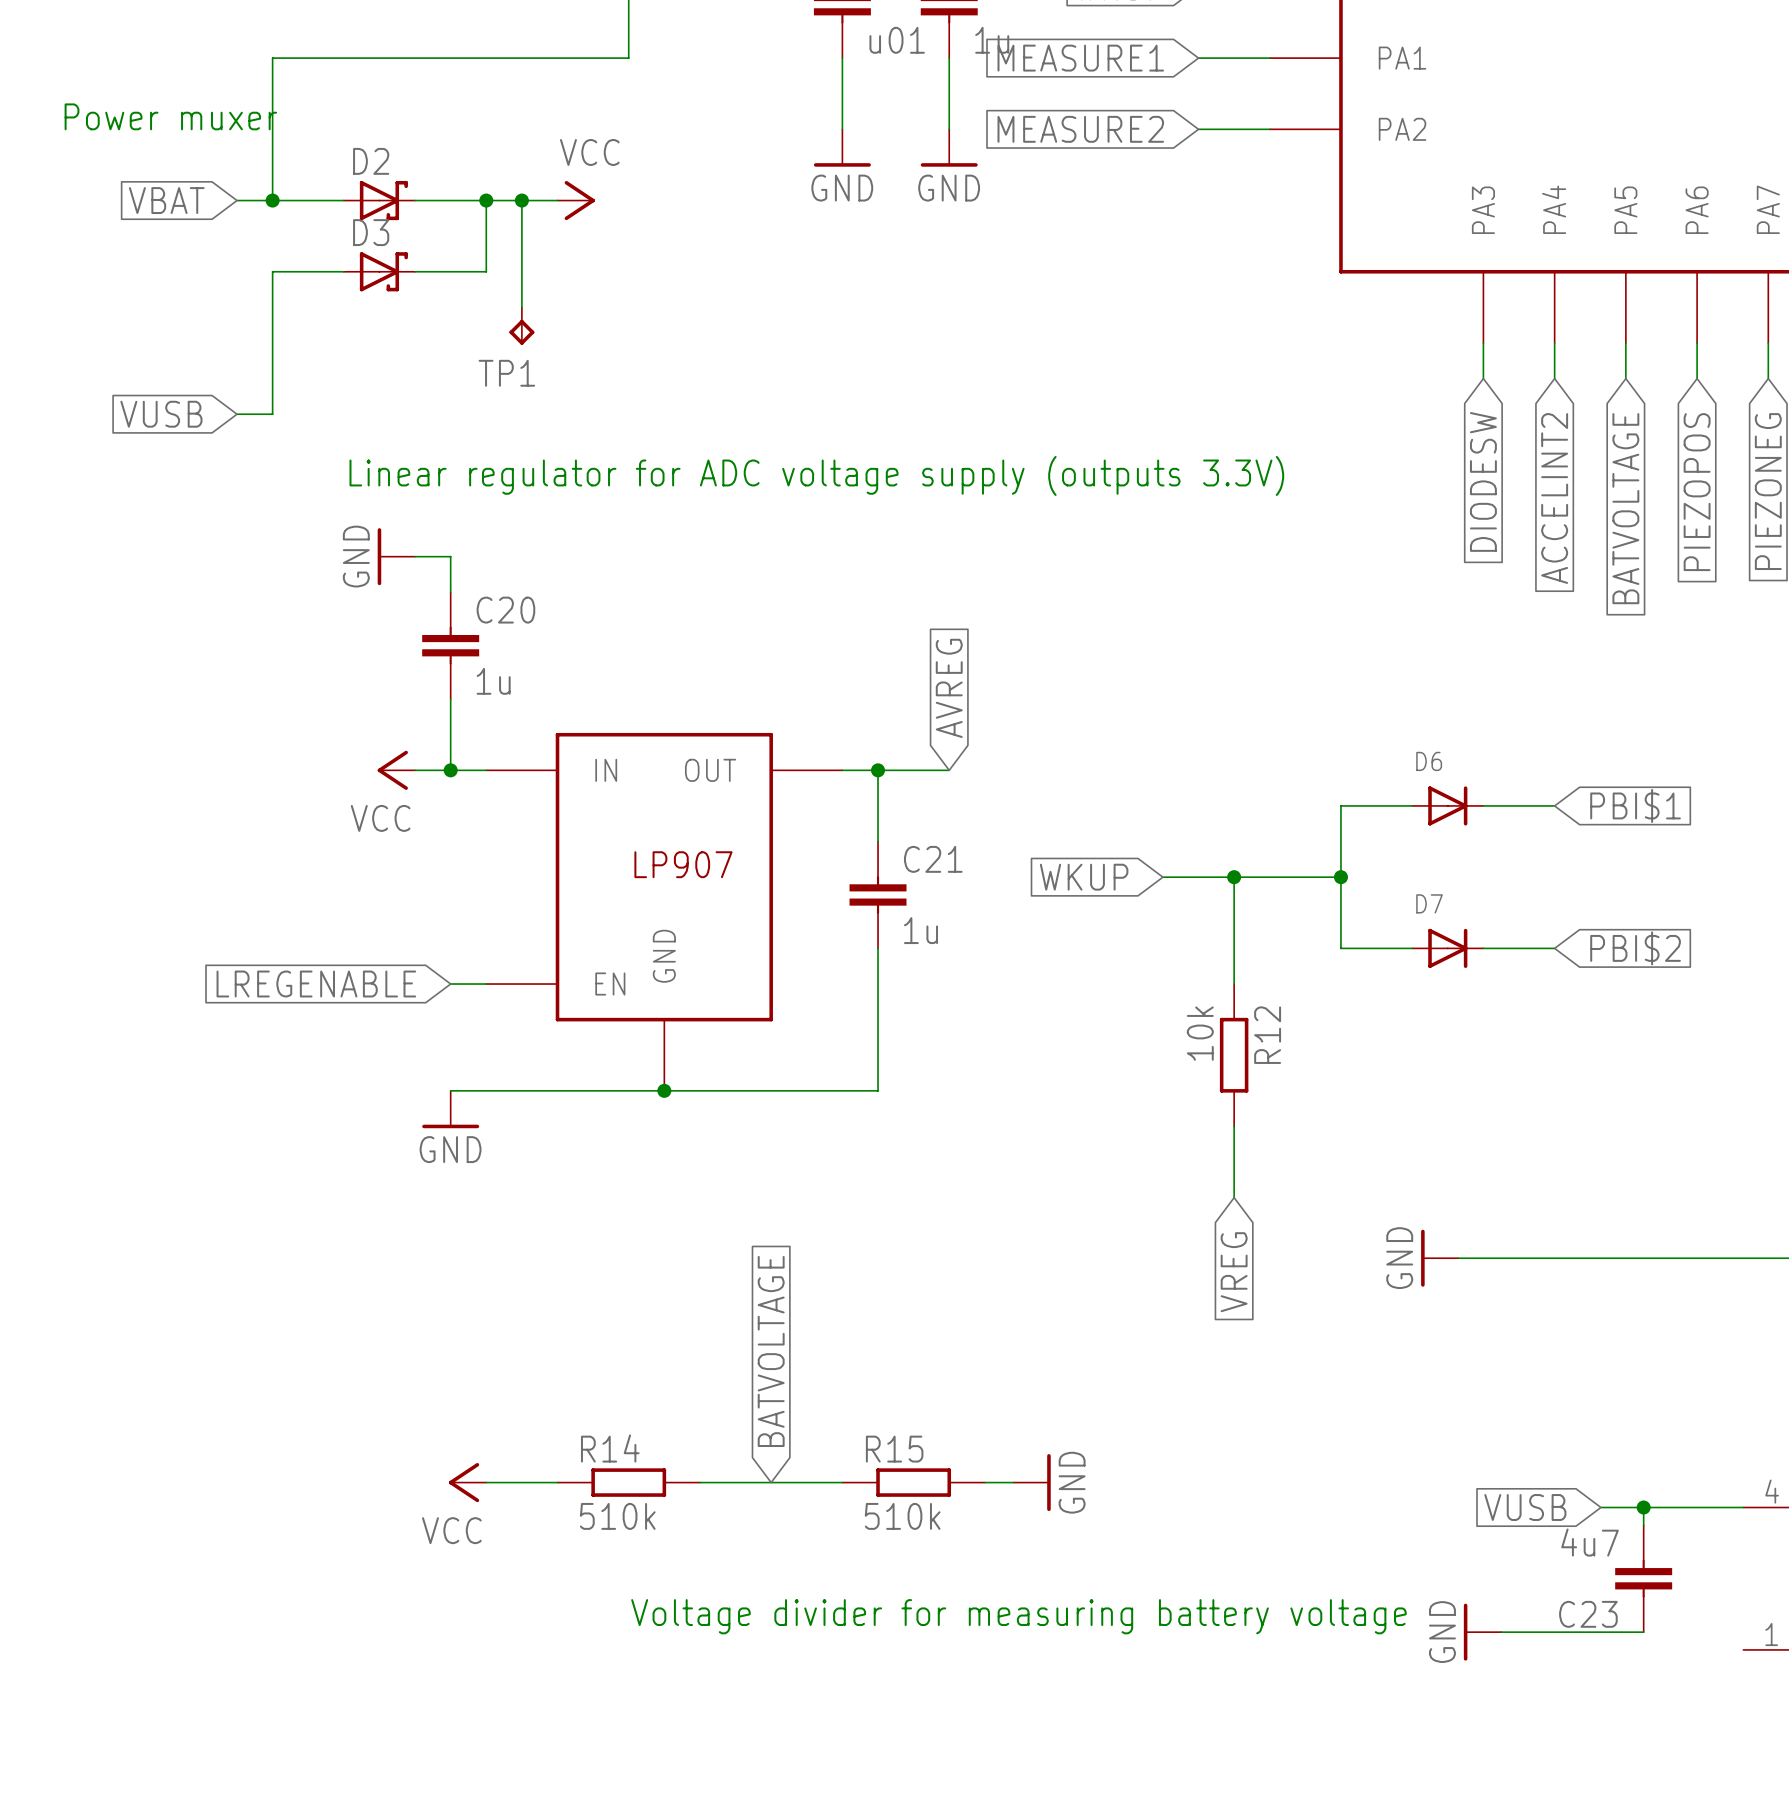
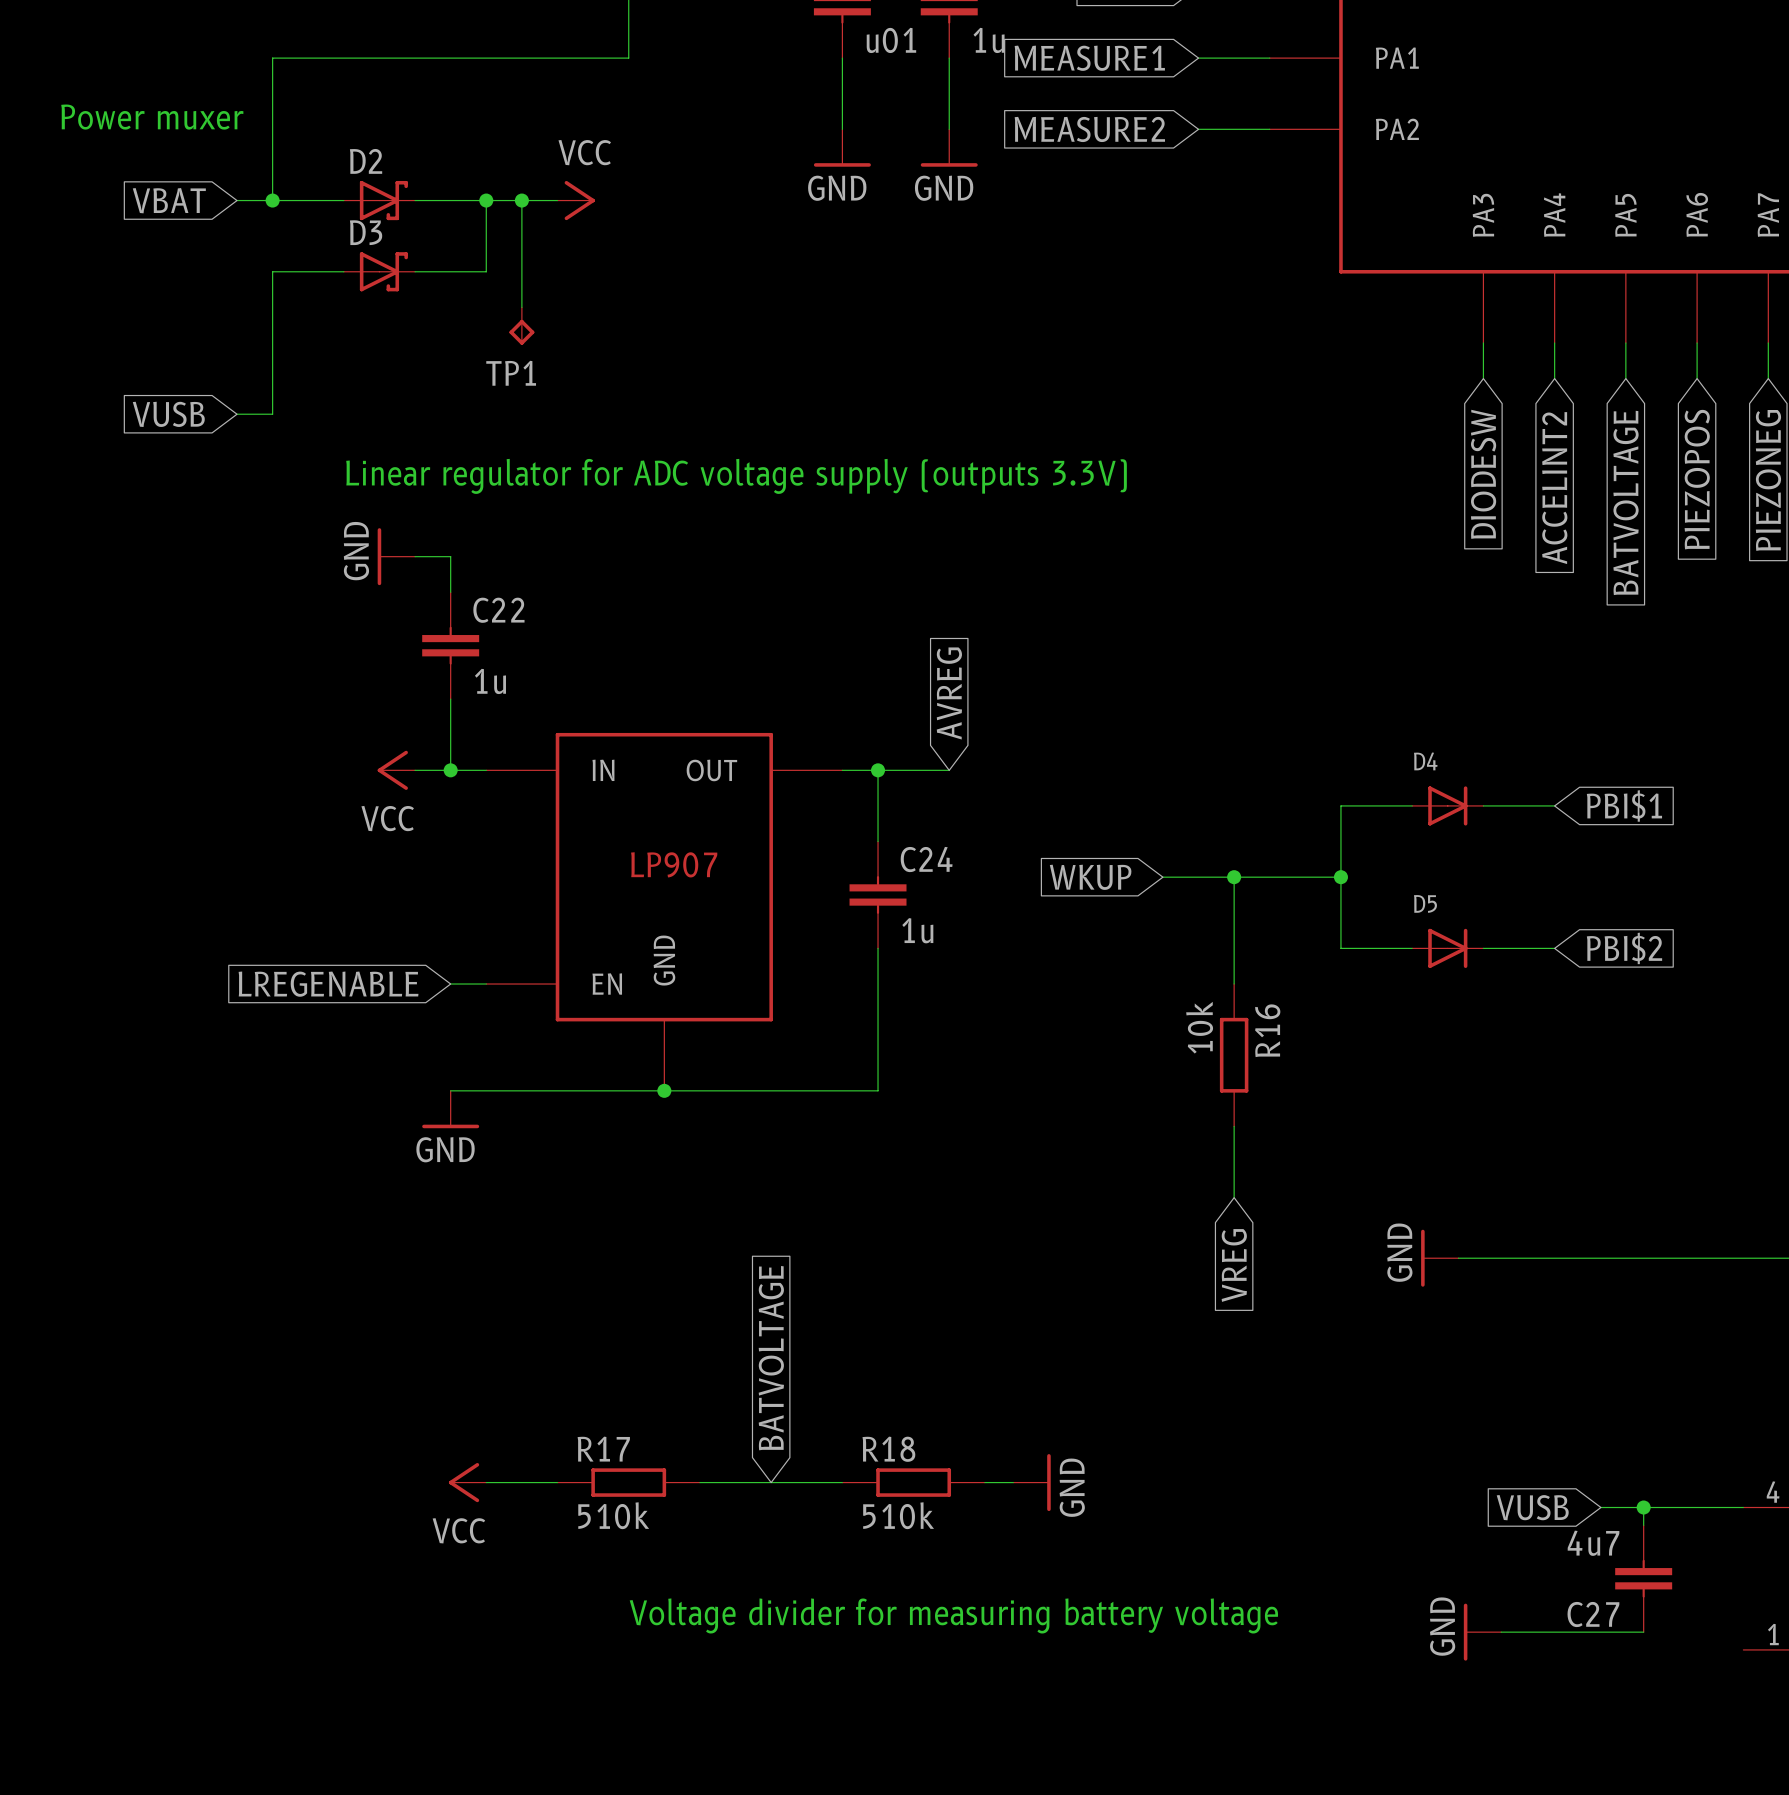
C20 name: C20 (505, 610) -> C22 (498, 610)
D6 name: D6 (1429, 761) -> D4 (1425, 761)
C21 name: C21 (933, 859) -> C24 (926, 859)
D7 name: D7 (1429, 903) -> D5 (1425, 903)
R12 name: R12 (1267, 1035) -> R16 (1267, 1030)
R14 name: R14 (610, 1448) -> R17 (603, 1449)
R15 name: R15 (894, 1449) -> R18 (888, 1449)
C23 name: C23 (1588, 1614) -> C27 (1593, 1614)

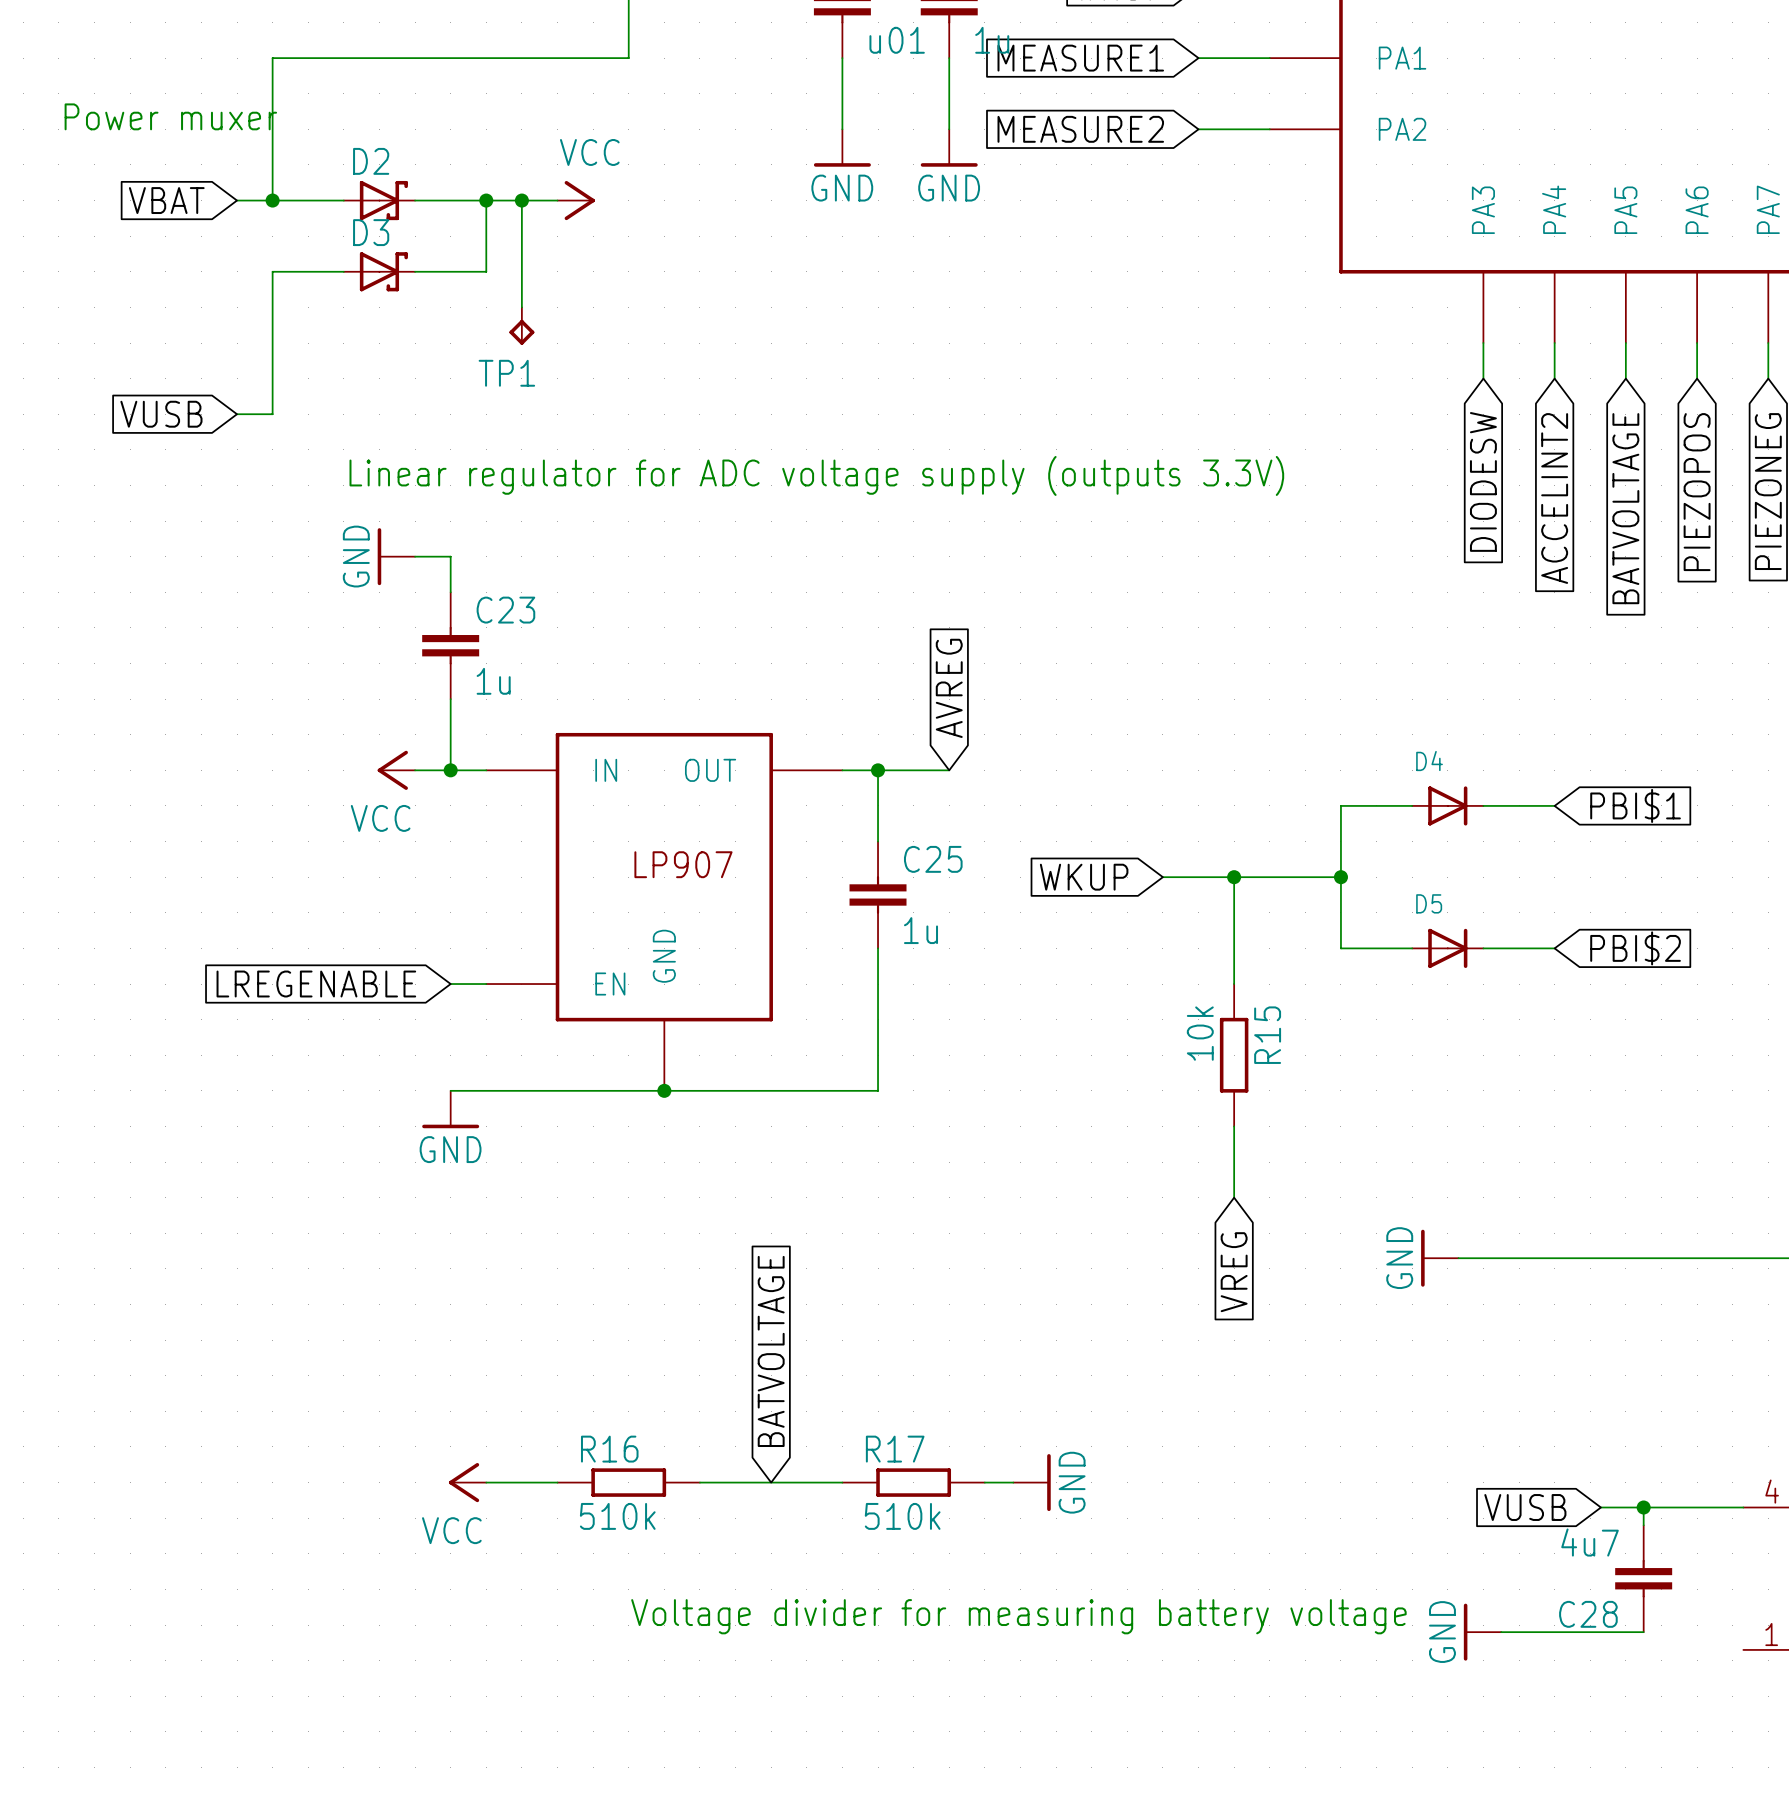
C22 name: C22 (498, 610) -> C23 (505, 610)
C24 name: C24 (926, 859) -> C25 (933, 859)
R16 name: R16 (1267, 1030) -> R15 (1267, 1035)
R17 name: R17 (603, 1449) -> R16 (609, 1449)
R18 name: R18 (888, 1449) -> R17 (895, 1449)
C27 name: C27 (1593, 1614) -> C28 (1588, 1614)

